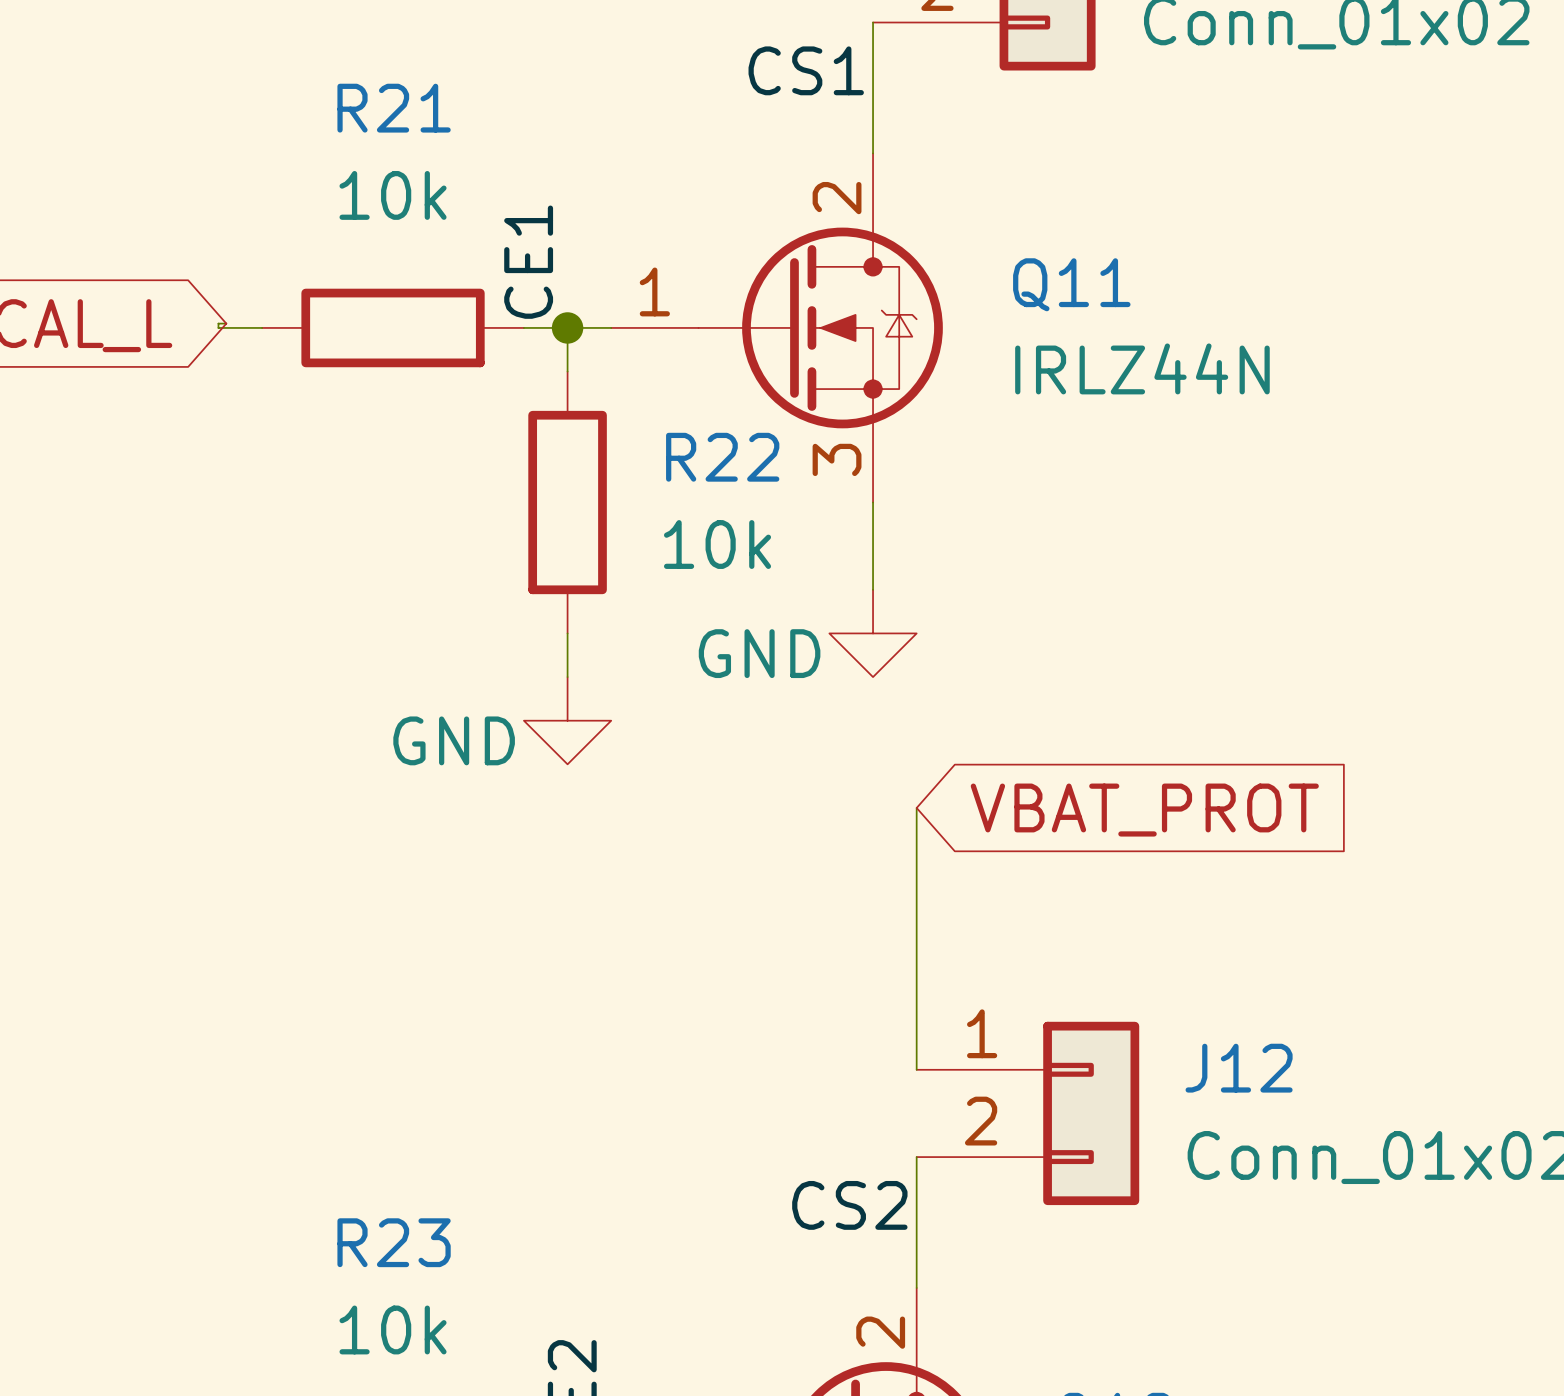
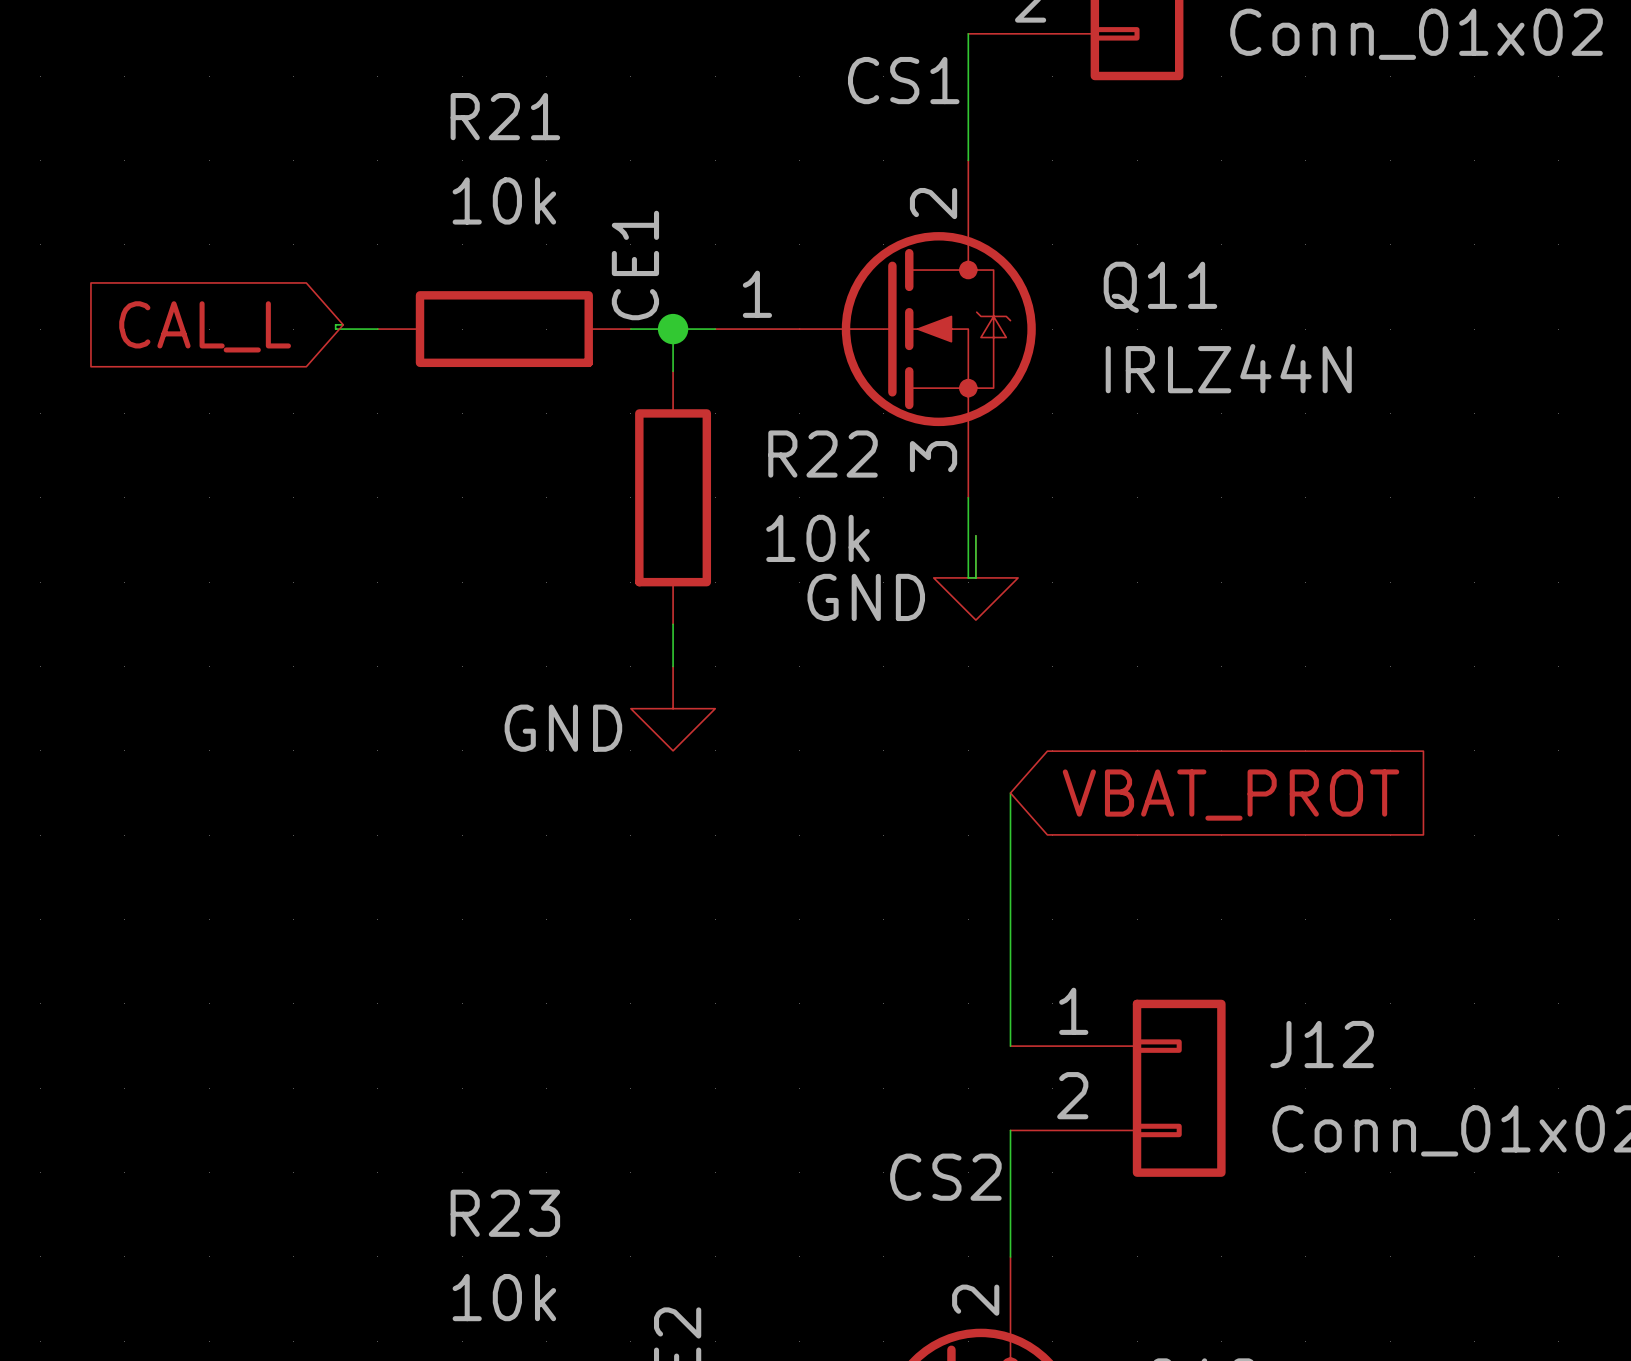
wire: (873, 585) (873, 589) -> (968, 577) (975, 577) (975, 535)
power symbol position: GND (873, 633) -> GND (975, 577)

